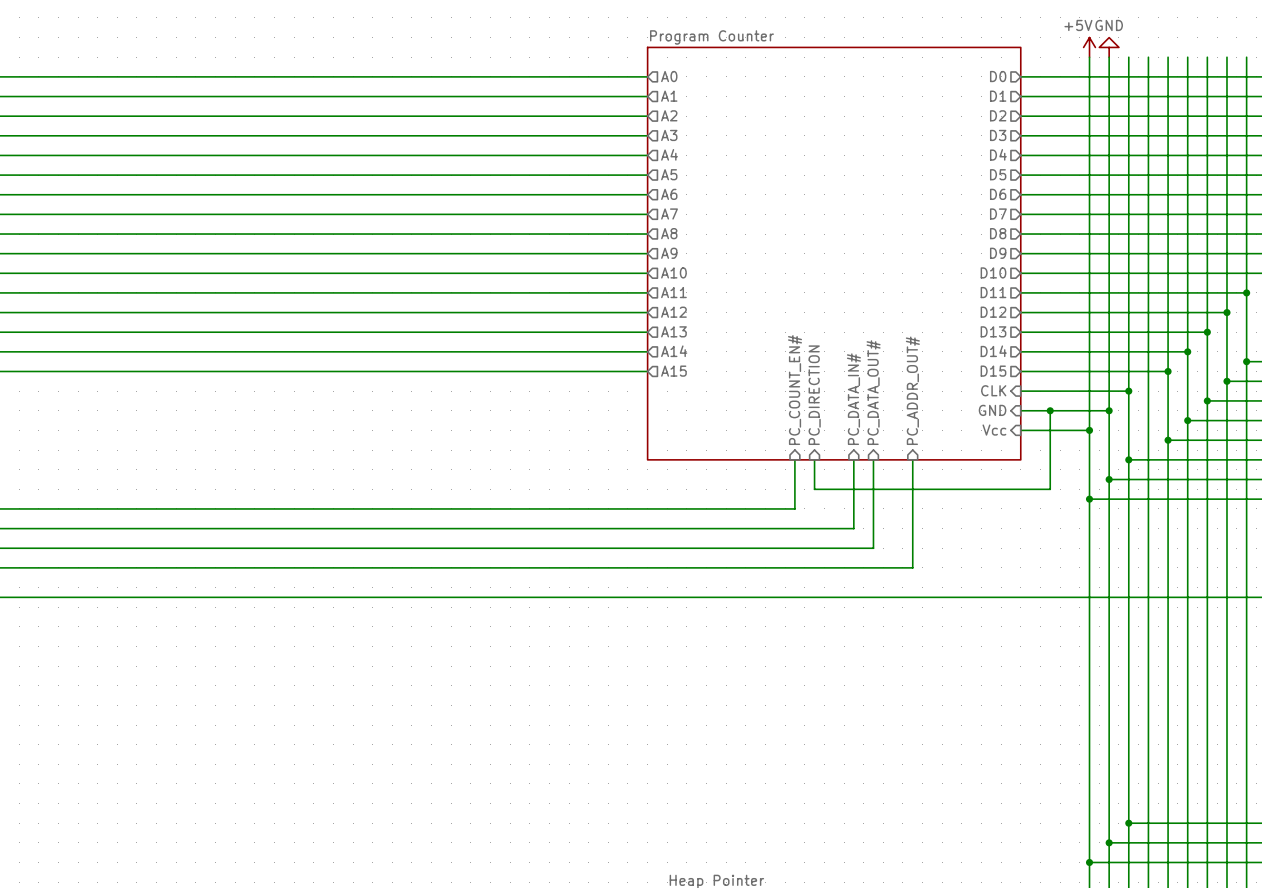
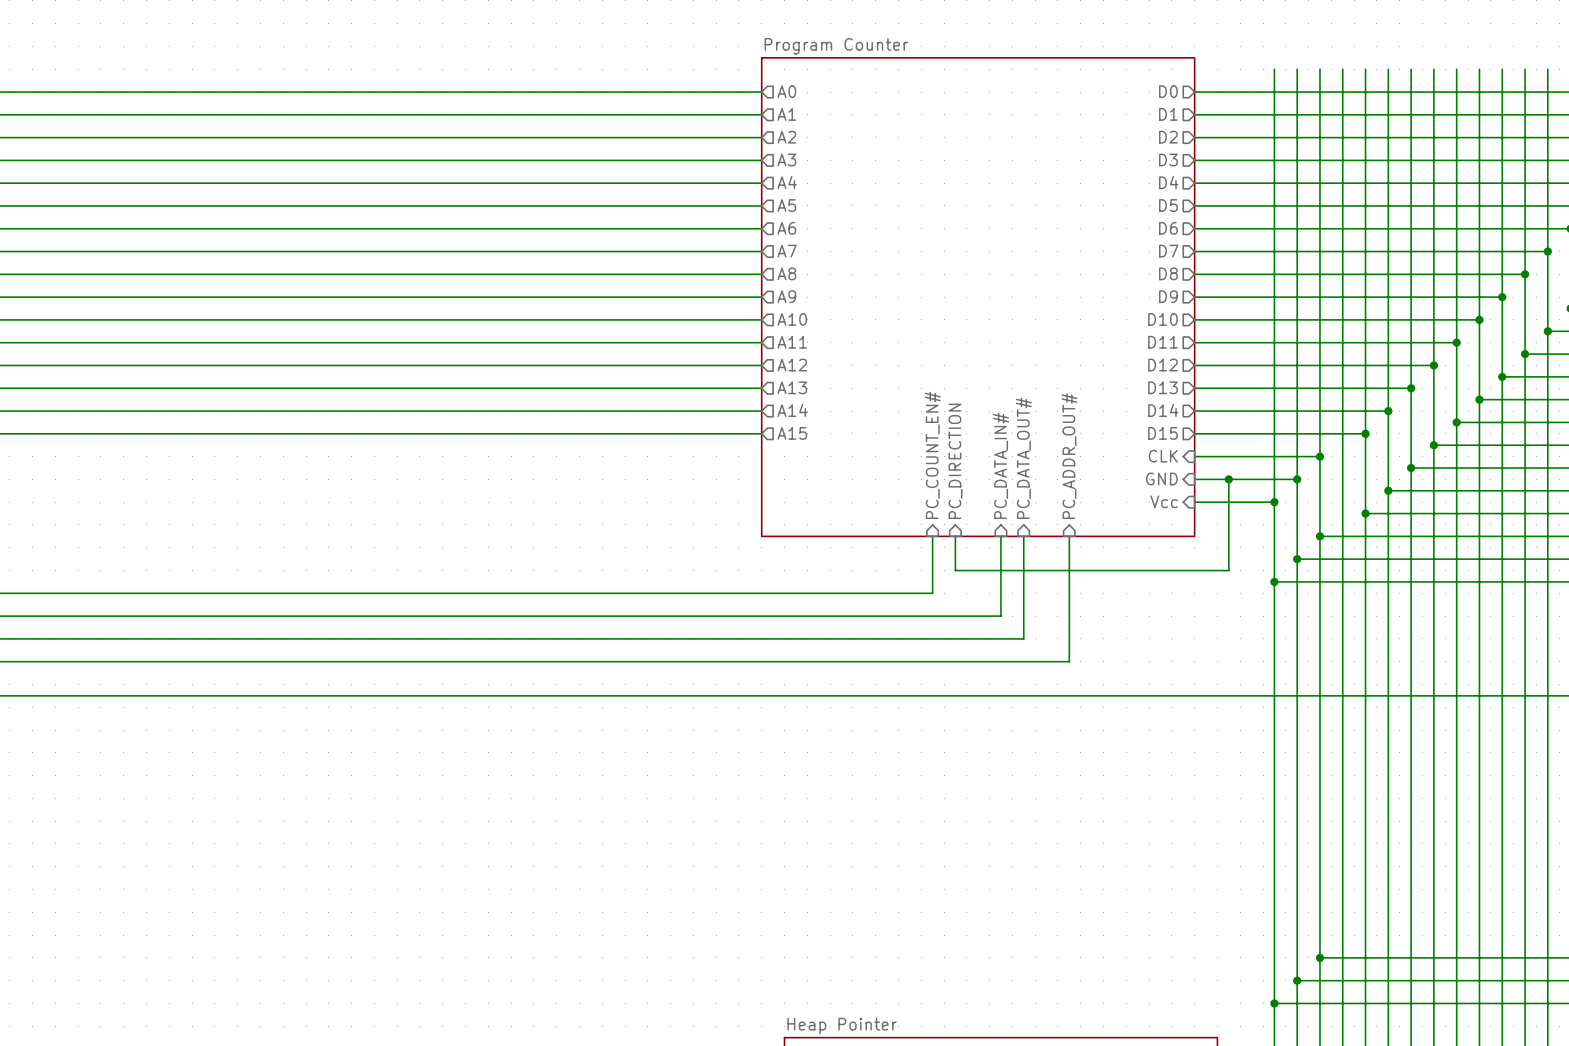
power symbol: +5V (1089, 47) -> none
power symbol: GND (1109, 47) -> none

